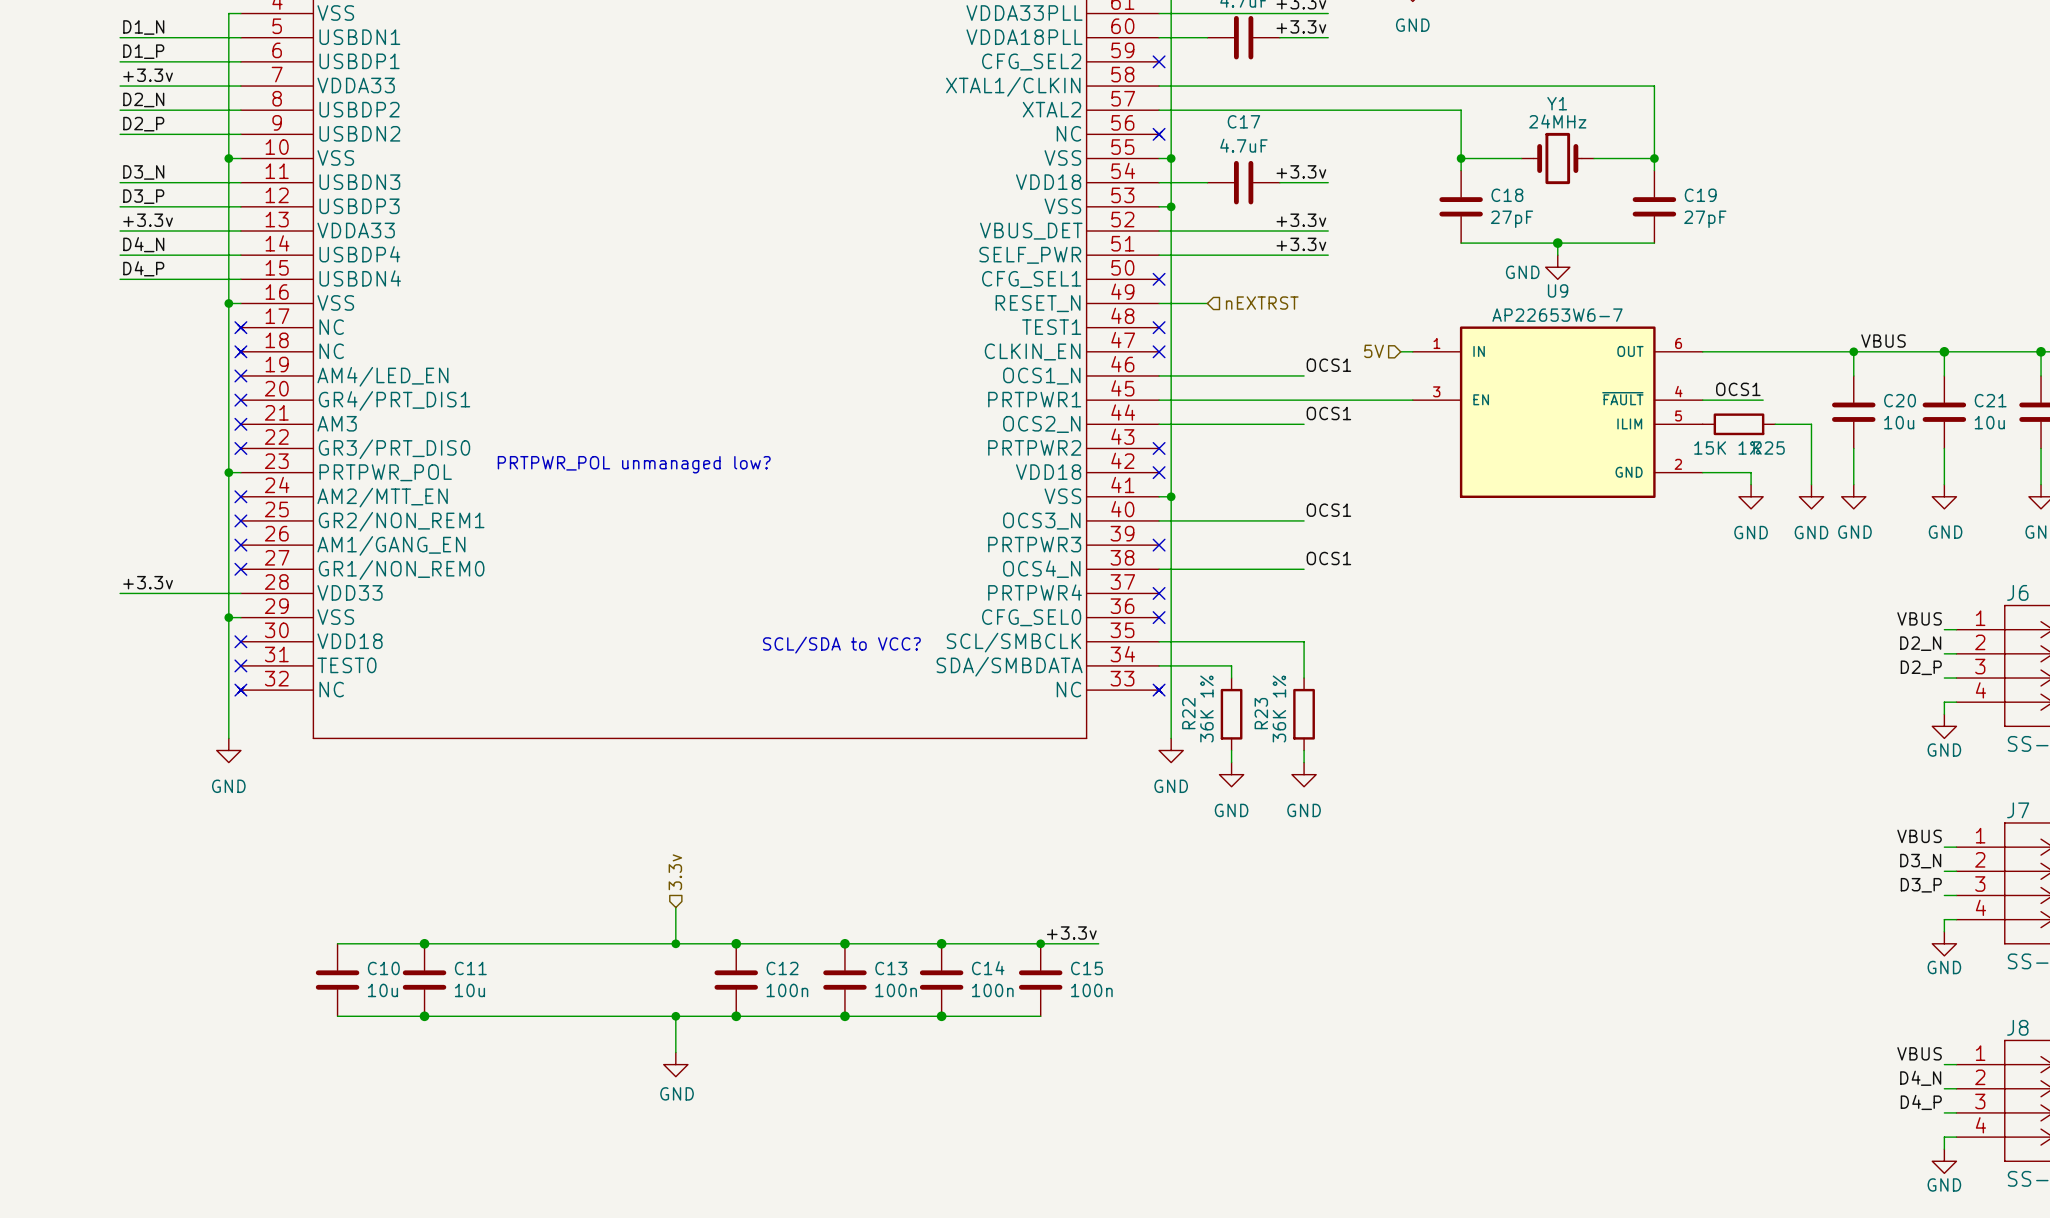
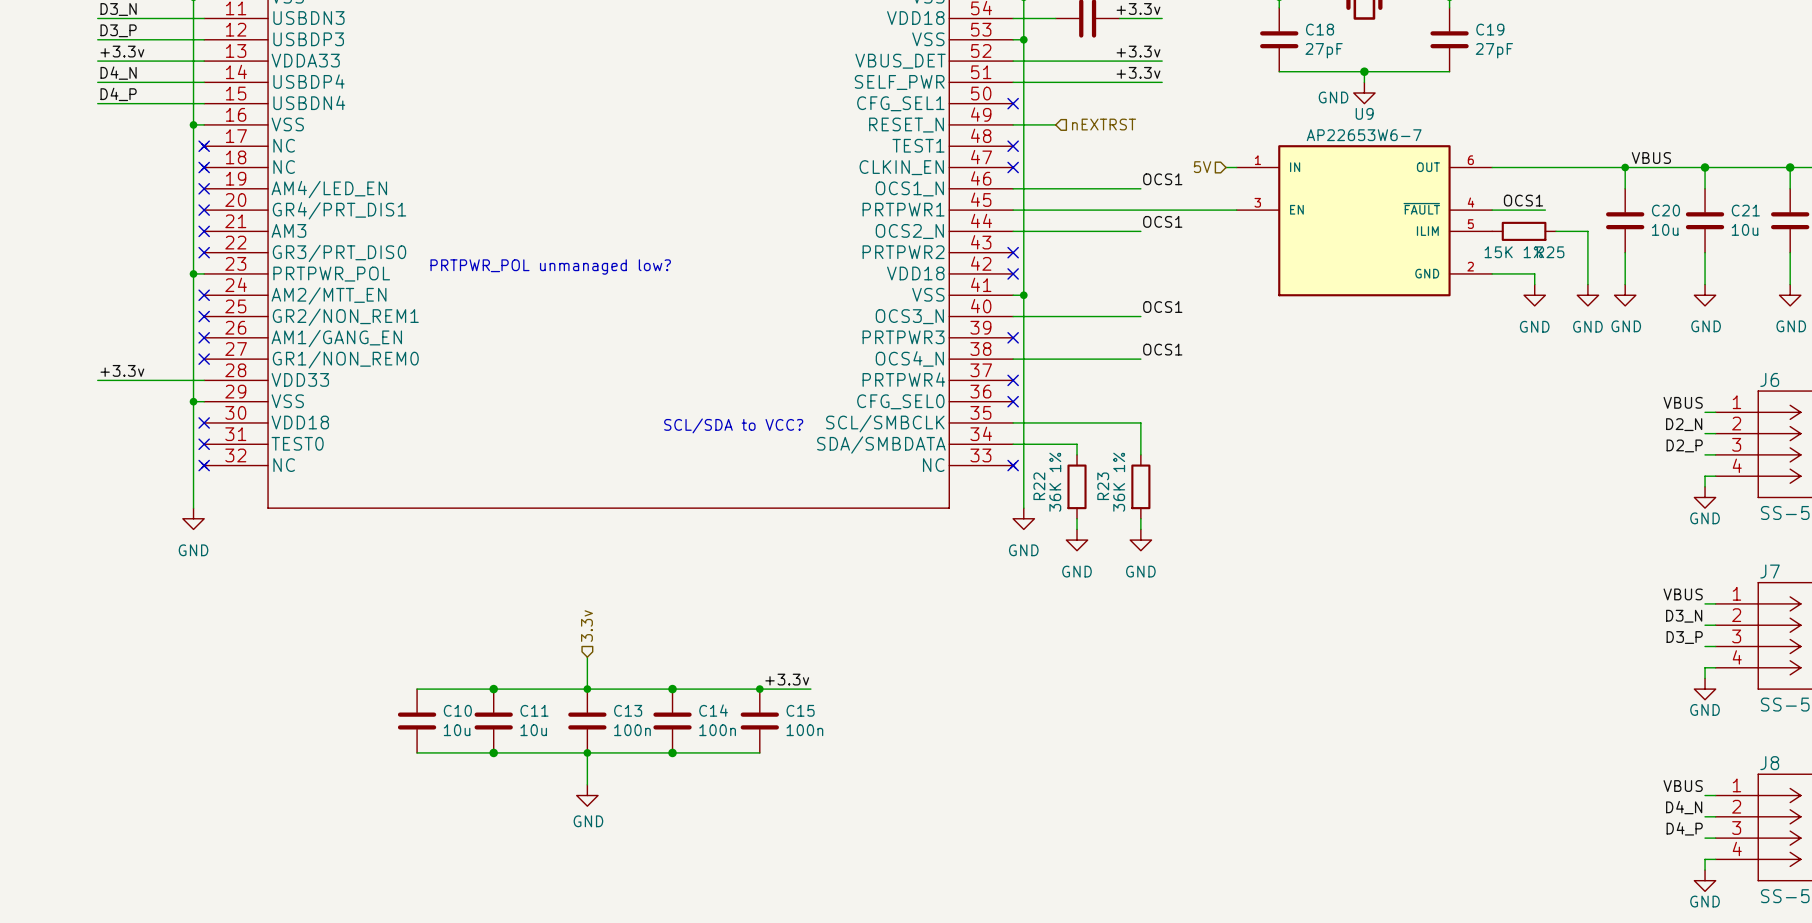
label position: +3.3v (1071, 933) -> +3.3v (787, 679)
wire: (337, 943) (482, 943) -> none
junction: (424, 943) -> none
junction: none -> (493, 689)
junction: (736, 943) -> none
junction: none -> (672, 689)
junction: (844, 943) -> none
junction: none -> (759, 689)
wire: (929, 943) (1098, 943) -> none
junction: (941, 943) -> none
junction: (1040, 943) -> none
C10 position: (337, 980) -> (417, 721)
C11 position: (424, 980) -> (493, 721)
C12: 100n (736, 980) -> none
C13 position: (844, 980) -> (587, 721)
C14 position: (941, 980) -> (672, 721)
C15 position: (1040, 980) -> (759, 721)
wire: (337, 1016) (482, 1016) -> none
junction: (424, 1016) -> none
junction: none -> (493, 752)
junction: (736, 1016) -> none
junction: none -> (672, 752)
junction: (844, 1016) -> none
wire: (871, 1016) (1040, 1016) -> none
junction: (941, 1016) -> none

